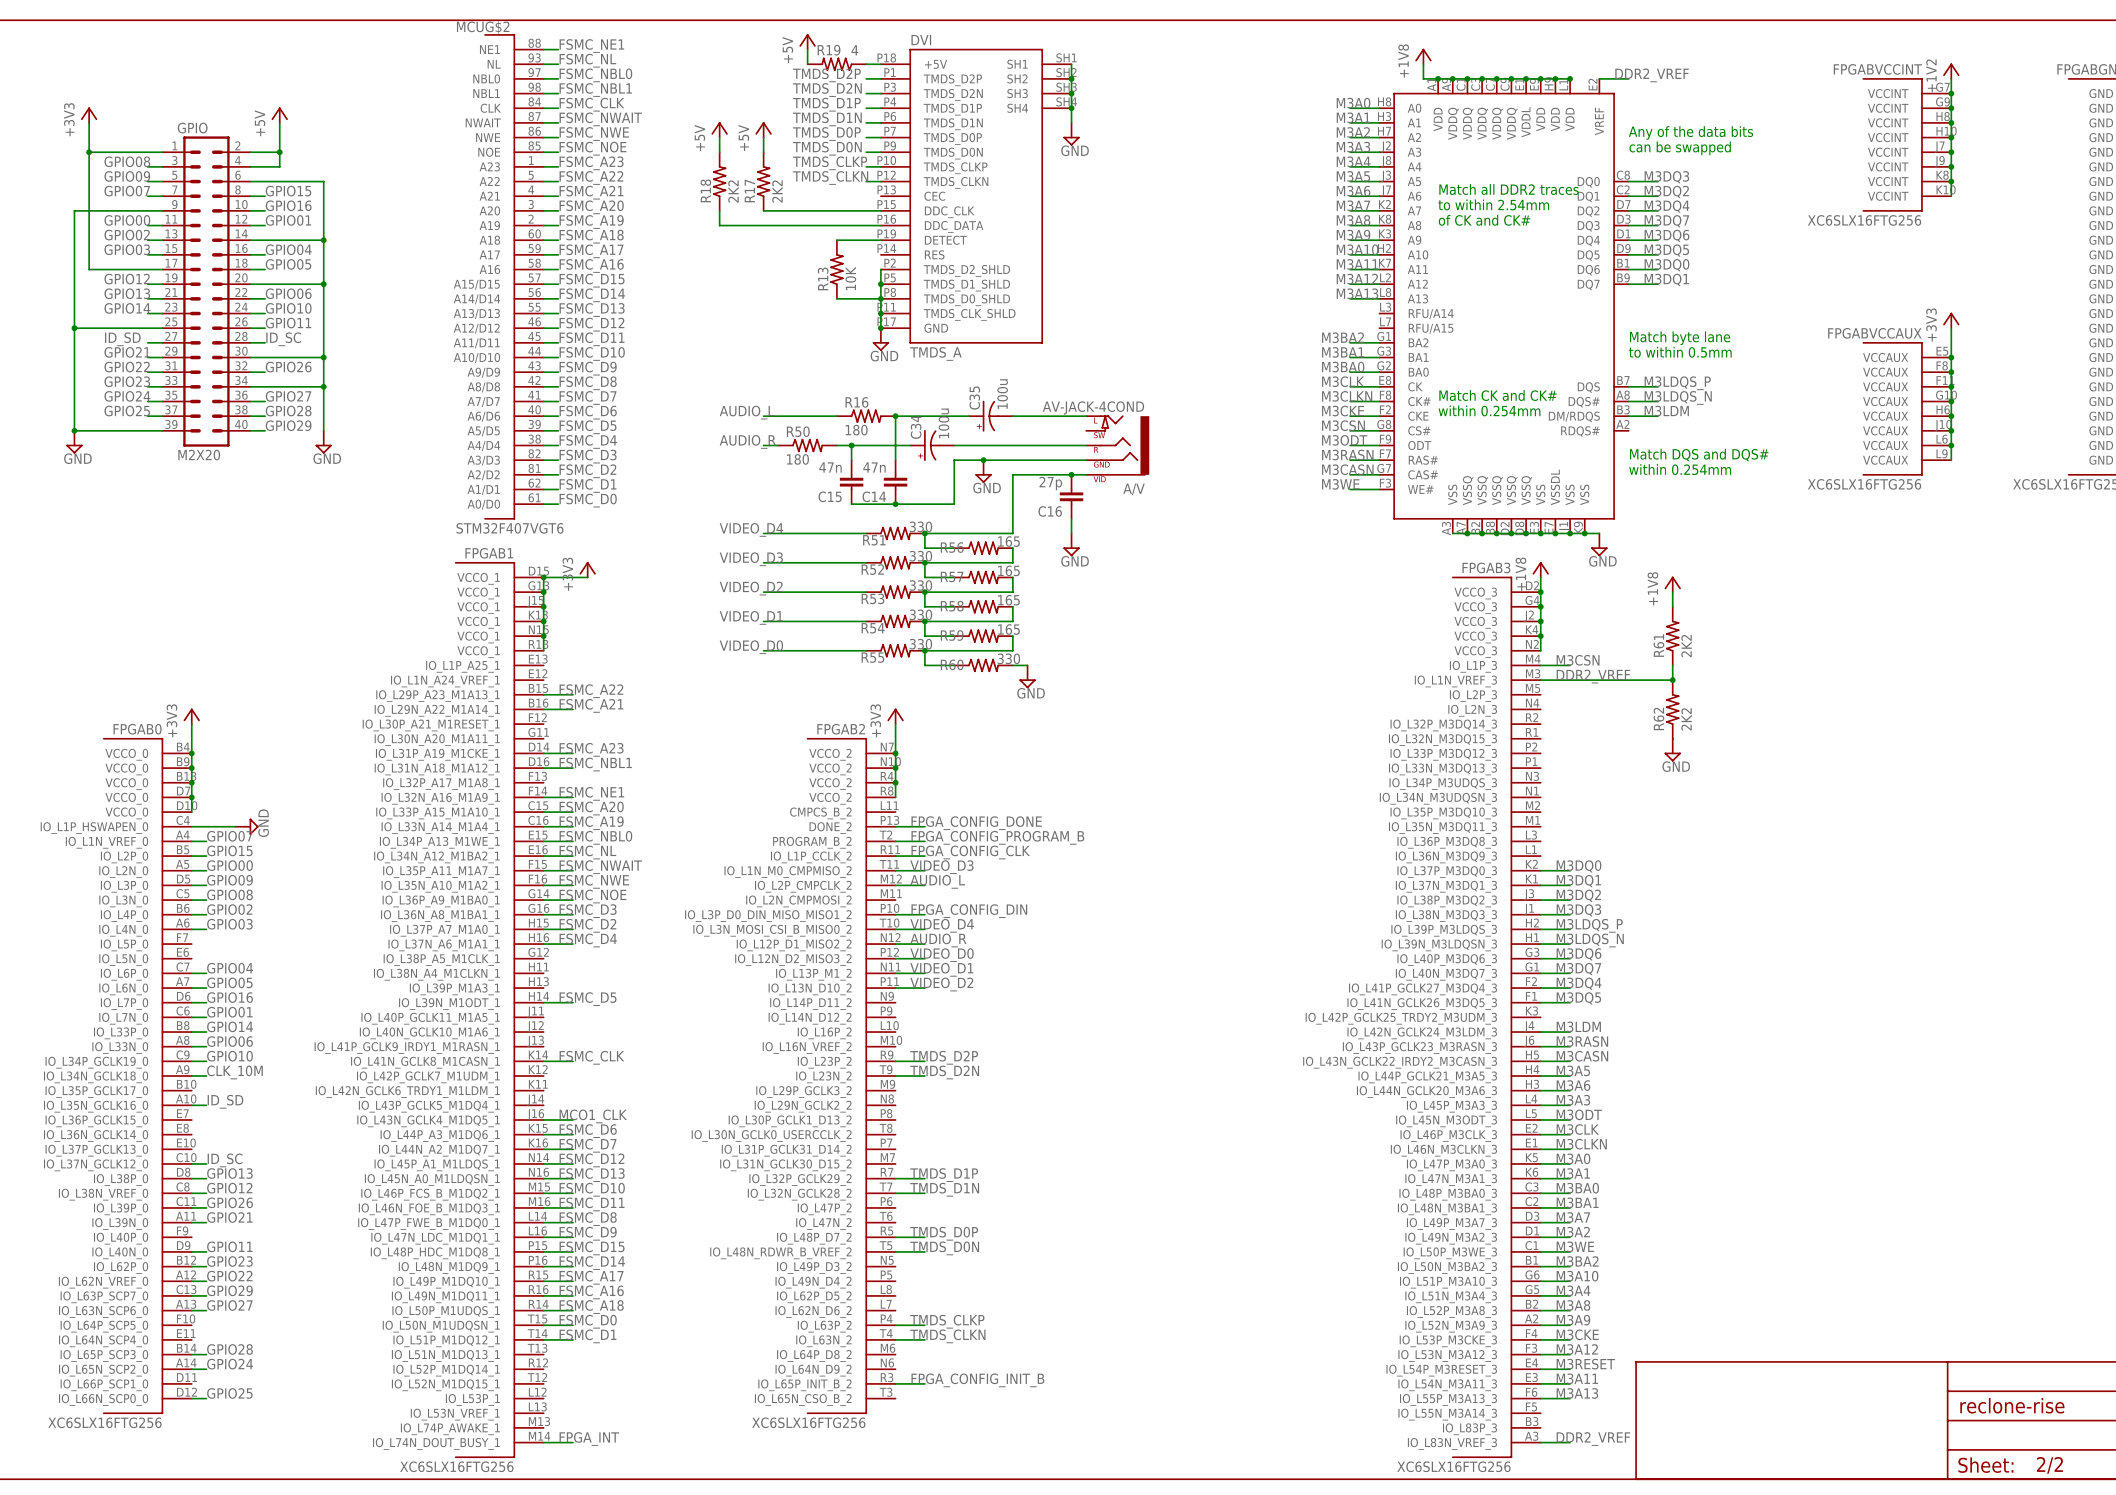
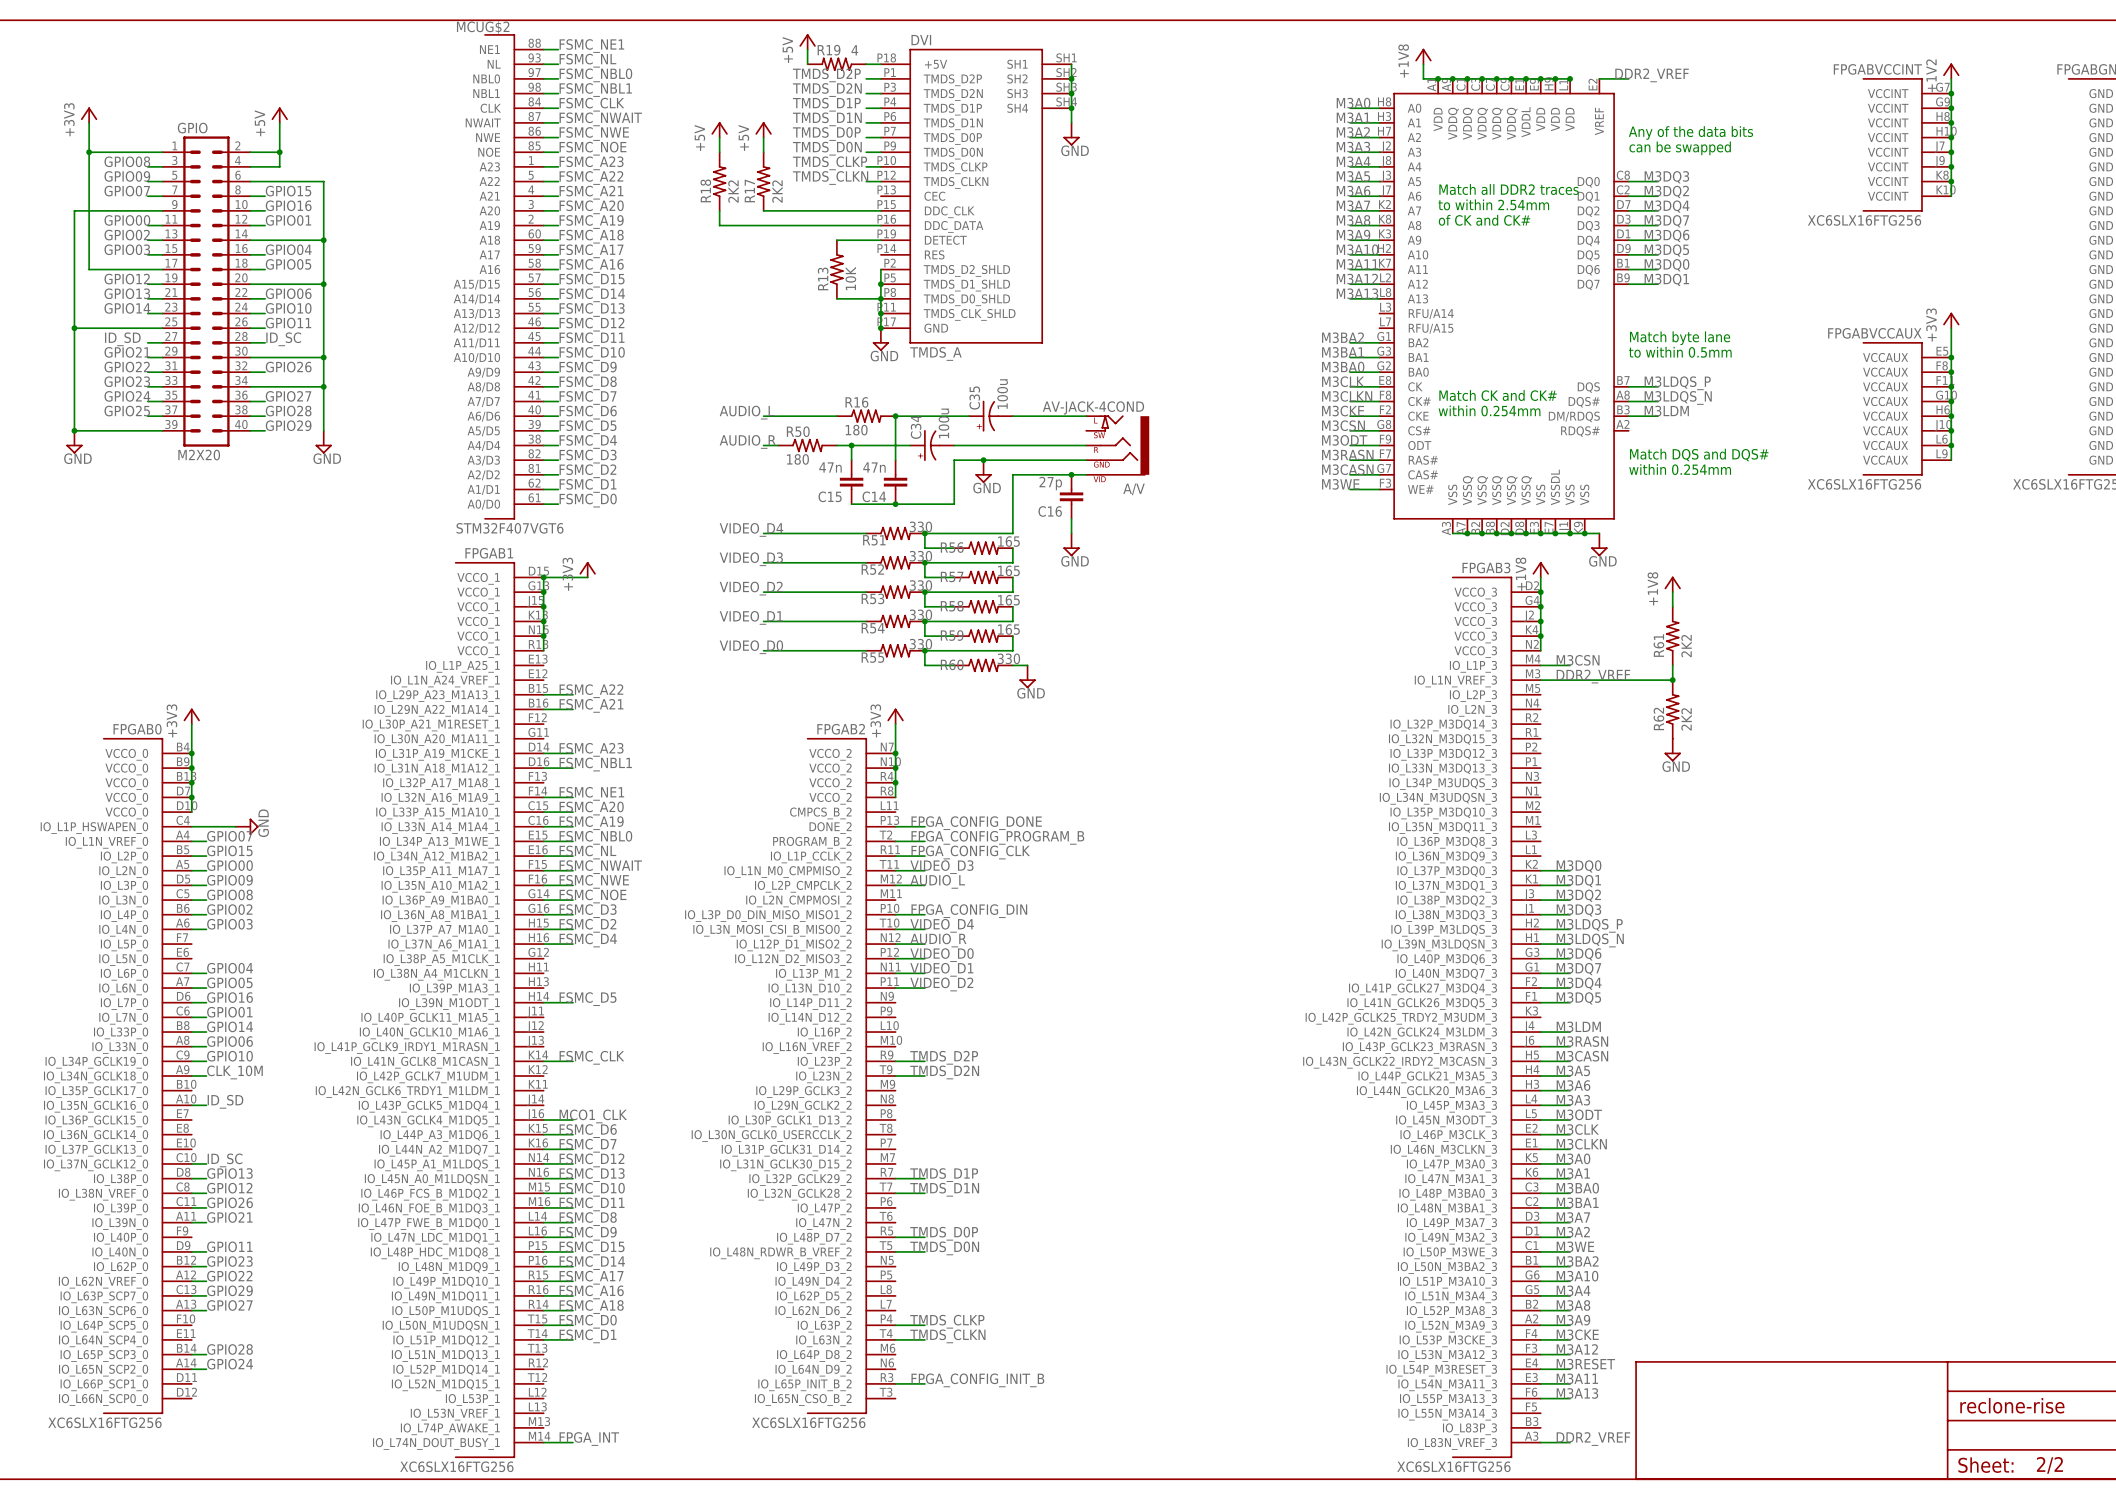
label: GPIO25 (229, 1393) -> none
wire: (191, 1398) (206, 1398) -> none

